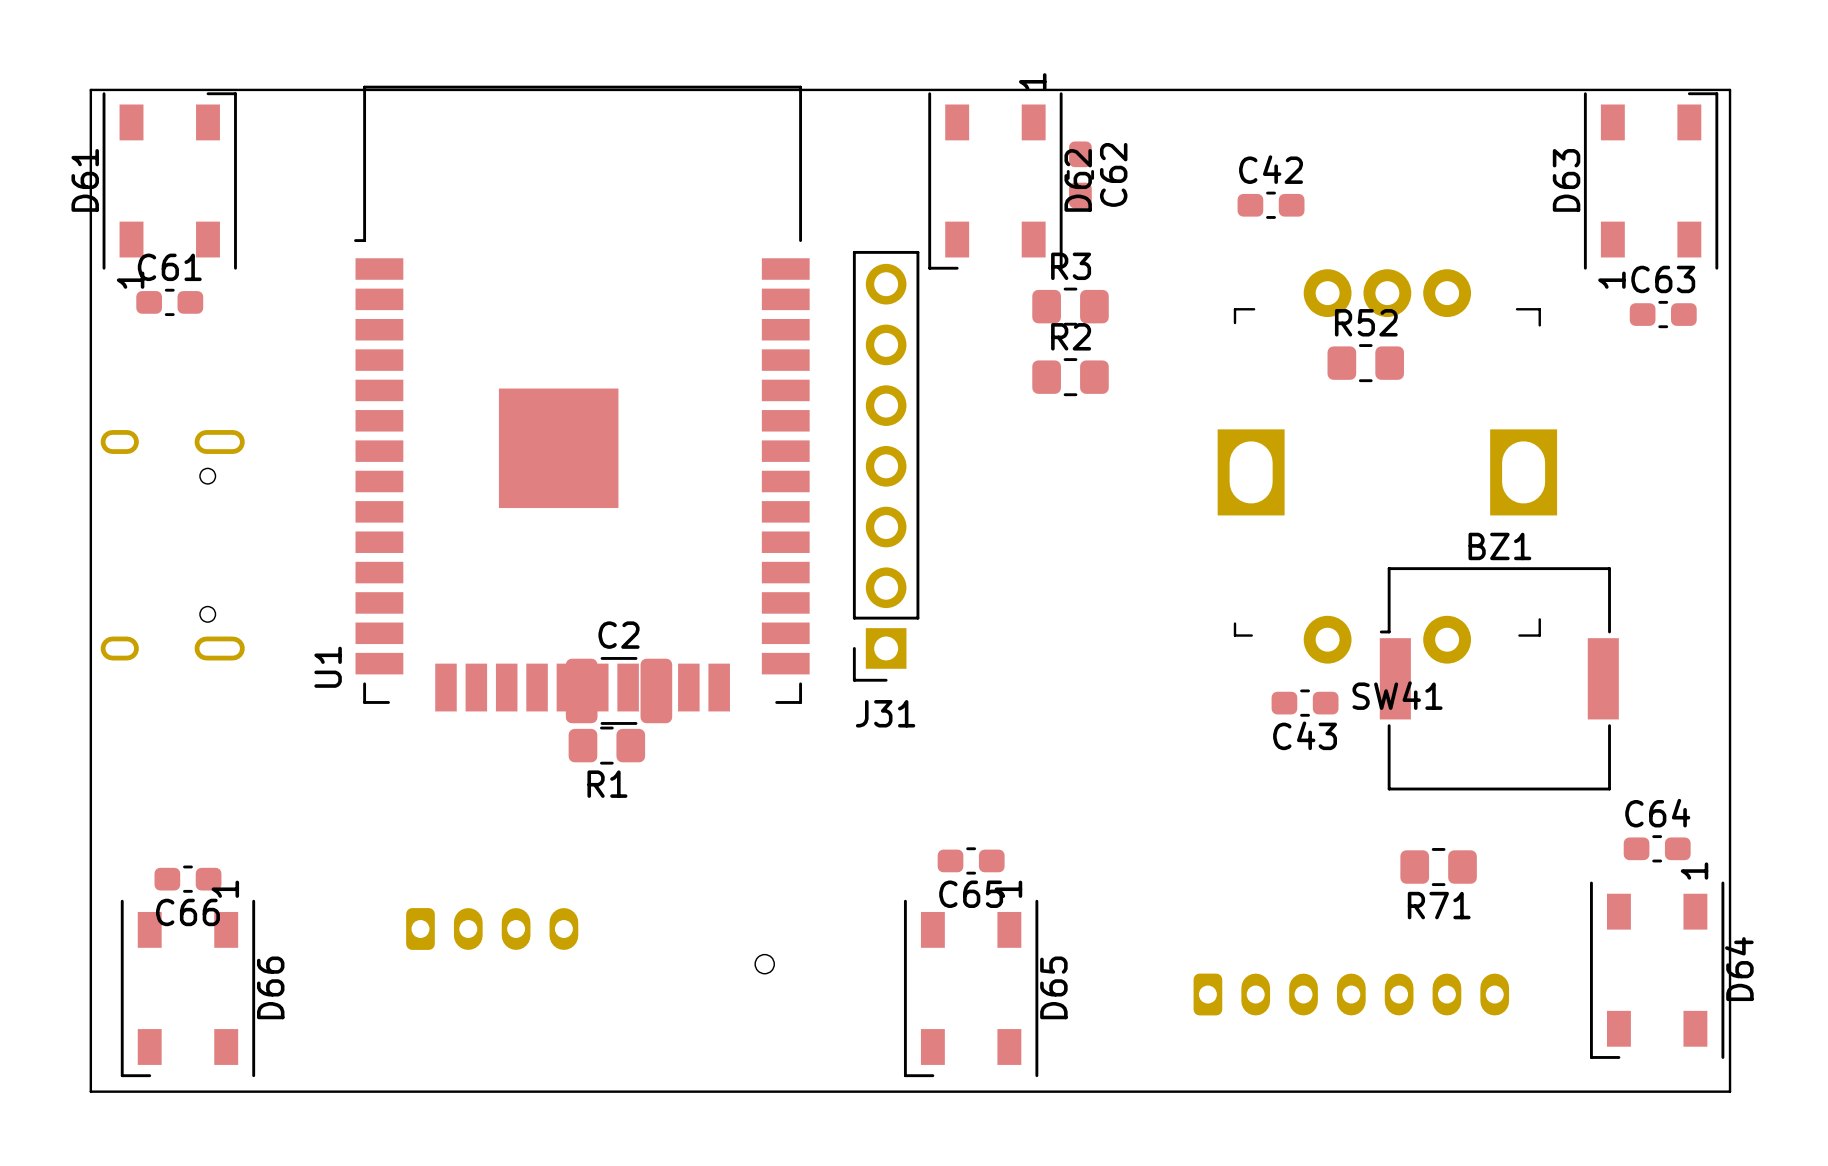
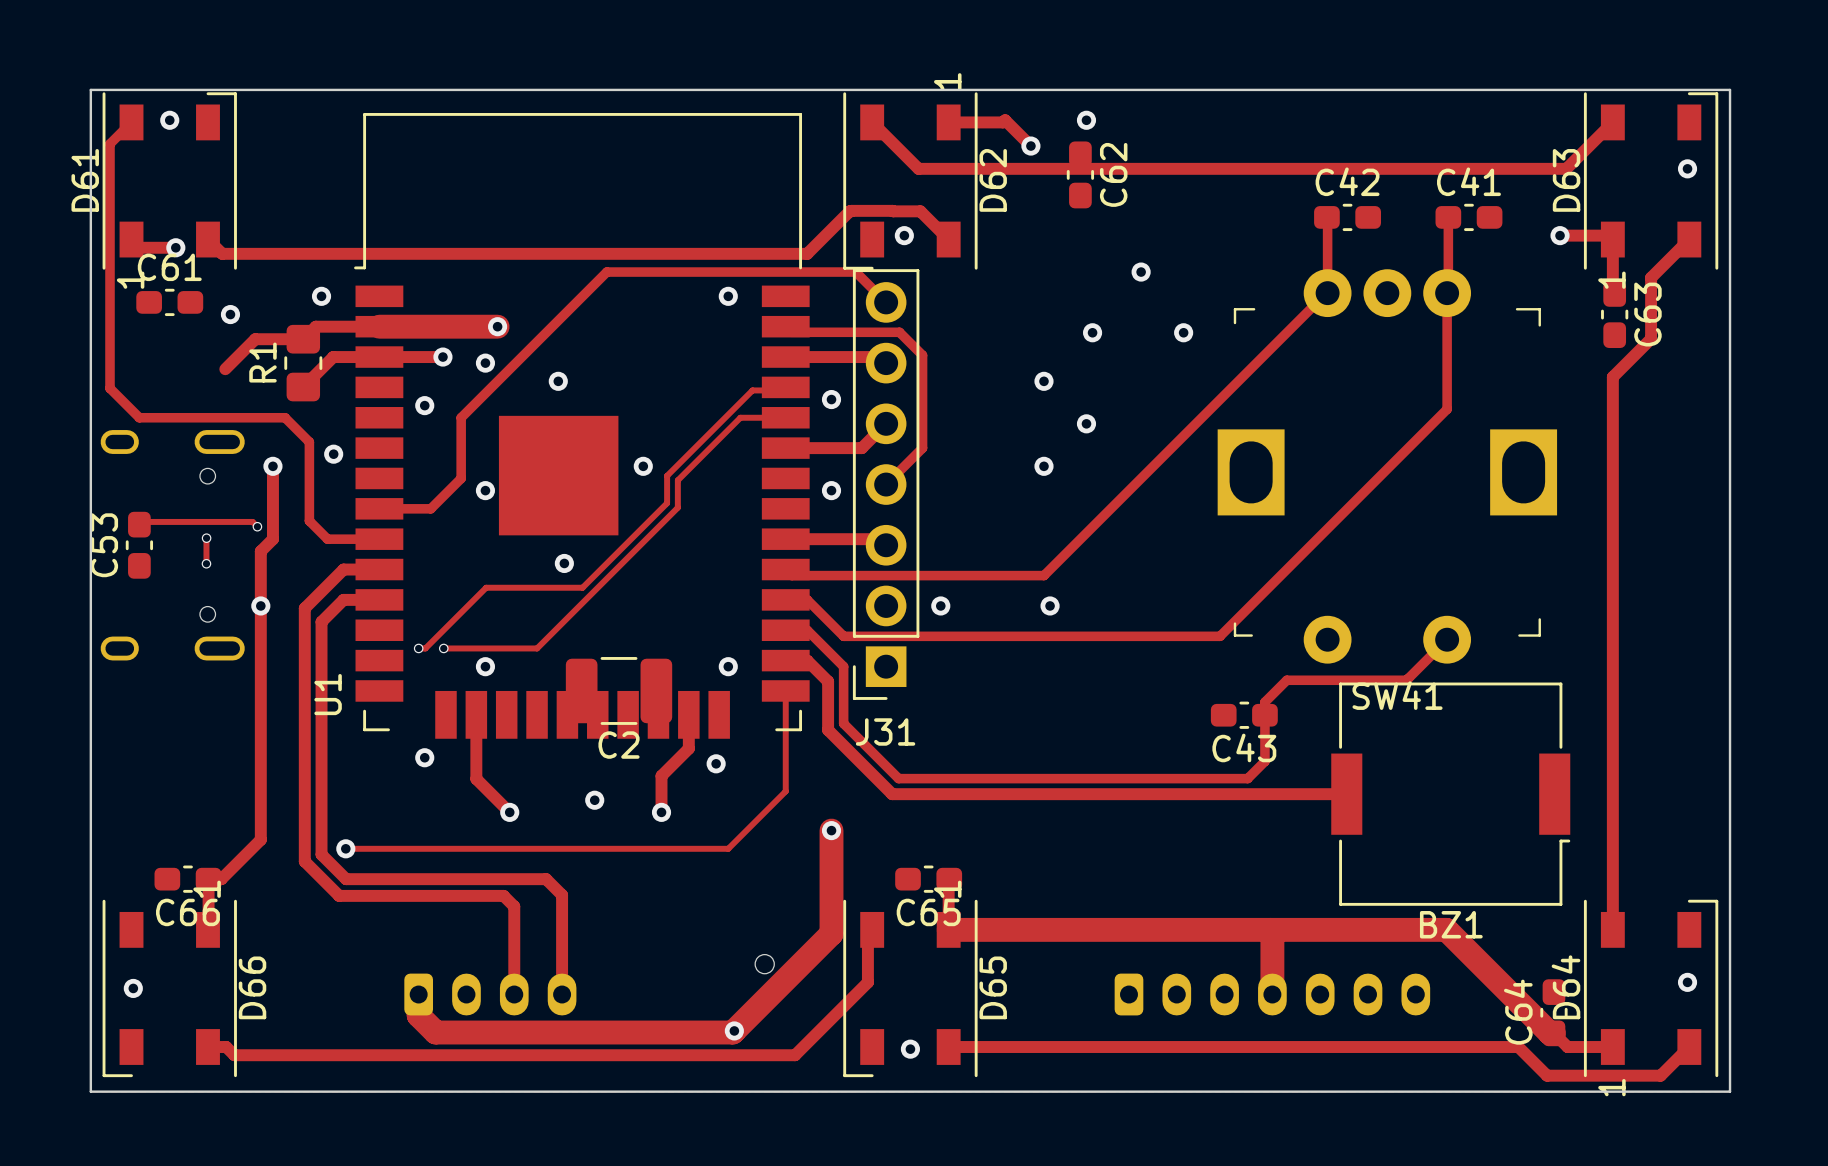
via: none -> (169, 120)
via: none -> (1086, 120)
track: none -> (131, 122) (110, 143) (110, 388) (139, 417) (285, 417) (309, 442) (309, 520) (327, 539) (379, 539)
track: none -> (872, 122) (918, 168) (1566, 168) (1612, 122)
track: none -> (948, 122) (1003, 122) (1005, 120) (1030, 146)
via: none -> (1030, 146)
via: none -> (1687, 168)
D62 position: (995, 180) -> (910, 180)
C42 position: (1271, 205) -> (1347, 217)
track: none -> (1326, 217) (1327, 293) (1043, 575) (791, 575) (785, 569)
track: none -> (1448, 217) (1447, 409) (1220, 636) (843, 636) (807, 599) (785, 599)
C41: none -> (1468, 217)
via: none -> (904, 235)
track: none -> (1560, 235) (1608, 235) (1612, 239) (1612, 284)
via: none -> (1560, 235)
track: none -> (207, 239) (222, 253) (807, 253) (851, 210) (920, 211) (948, 239)
track: none -> (1689, 239) (1651, 277) (1651, 338) (1612, 377) (1612, 929)
track: none -> (139, 247) (175, 247)
via: none -> (175, 247)
via: none -> (1141, 272)
via: none -> (321, 296)
via: none -> (728, 296)
track: none -> (886, 302) (855, 272) (606, 272) (461, 417) (461, 478) (430, 508) (379, 508)
R3: (1070, 306) -> none
via: none -> (230, 314)
C63 rotation: 0° (1663, 314) -> 90° clockwise (1614, 314)
C63 position: (1663, 314) -> (1614, 314)
track: none -> (497, 326) (315, 326) (303, 339) (255, 339) (225, 369)
via: none -> (497, 326)
track: none -> (785, 326) (791, 332) (899, 332) (922, 355) (922, 448) (886, 484)
via: none -> (1092, 332)
via: none -> (1183, 332)
track: none -> (442, 357) (333, 357) (303, 387)
via: none -> (442, 357)
track: none -> (785, 357) (880, 357) (886, 363)
via: none -> (485, 363)
R52: (1365, 363) -> none
R2: (1070, 377) -> none
via: none -> (558, 381)
via: none -> (1043, 381)
track: none -> (785, 390) (752, 390) (667, 475) (667, 503) (582, 587) (486, 587) (425, 648) (418, 648)
U1 position: (581, 398) -> (581, 425)
via: none -> (831, 399)
via: none -> (424, 405)
track: none -> (785, 417) (740, 417) (677, 480) (677, 507) (537, 648) (443, 648)
track: none -> (886, 423) (861, 448) (785, 448)
via: none -> (1086, 423)
via: none -> (333, 454)
track: none -> (272, 466) (272, 539) (260, 551) (260, 839) (221, 879) (208, 879) (207, 929)
via: none -> (272, 466)
via: none -> (643, 466)
J31 position: (886, 466) -> (886, 484)
via: none -> (1043, 466)
via: none -> (485, 490)
via: none -> (831, 490)
track: none -> (144, 521) (252, 521) (257, 526)
via: none -> (257, 526)
track: none -> (206, 538) (206, 563)
via: none -> (206, 538)
track: none -> (785, 539) (880, 539) (886, 545)
C53: none -> (139, 545)
via: none -> (206, 563)
via: none -> (564, 563)
track: none -> (379, 569) (343, 569) (304, 608) (304, 861) (339, 895) (503, 895) (514, 906) (514, 994)
track: none -> (379, 599) (343, 599) (321, 621) (321, 854) (346, 879) (546, 879) (562, 895) (562, 994)
via: none -> (260, 605)
via: none -> (940, 605)
via: none -> (1050, 605)
track: none -> (788, 632) (785, 630) (807, 630) (843, 666) (843, 723) (898, 778) (1247, 778) (1264, 761) (1264, 702) (1286, 680) (1406, 680) (1447, 639)
C2 name position: C2 (619, 635) -> C2 (619, 745)
via: none -> (418, 648)
via: none -> (443, 648)
track: none -> (785, 660) (807, 660) (828, 681) (828, 730) (892, 794) (1346, 794)
via: none -> (485, 666)
via: none -> (728, 666)
BZ1 rotation: 0° (1499, 678) -> 180° (1450, 794)
track: none -> (785, 690) (785, 791) (728, 848) (345, 848)
C43 position: (1305, 703) -> (1244, 715)
track: none -> (476, 714) (476, 778) (509, 812)
track: none -> (688, 714) (688, 748) (661, 775) (661, 812)
R1 rotation: 0° (606, 745) -> 90° clockwise (303, 363)
R1 position: (606, 745) -> (303, 363)
via: none -> (424, 757)
via: none -> (716, 763)
via: none -> (594, 800)
via: none -> (509, 812)
via: none -> (661, 812)
C64 name position: C64 (1657, 813) -> C64 (1518, 1012)
track: none -> (831, 830) (831, 933) (732, 1032) (435, 1032) (418, 1015) (418, 994)
via: none -> (831, 830)
via: none -> (345, 848)
C64 rotation: 0° (1657, 848) -> 90° clockwise (1553, 1012)
C64 position: (1657, 848) -> (1553, 1012)
C65 position: (971, 860) -> (928, 879)
R71: (1438, 867) -> none
track: none -> (949, 879) (948, 929) (1446, 929) (1549, 1033) (1553, 1033) (1567, 1047) (1612, 1047)
part position: (492, 929) -> (490, 994)
track: none -> (872, 929) (867, 934) (867, 982) (795, 1055) (234, 1055) (226, 1047) (207, 1047)
track: none -> (1270, 929) (1272, 931) (1272, 994)
D64 rotation: 0° (1657, 970) -> 180° (1651, 988)
via: none -> (1687, 982)
via: none -> (133, 988)
D66 position: (187, 988) -> (169, 988)
D65 position: (971, 988) -> (910, 988)
part position: (1351, 994) -> (1272, 994)
via: none -> (734, 1030)
track: none -> (948, 1047) (1518, 1047) (1547, 1075) (1660, 1075) (1689, 1047)
via: none -> (910, 1049)

